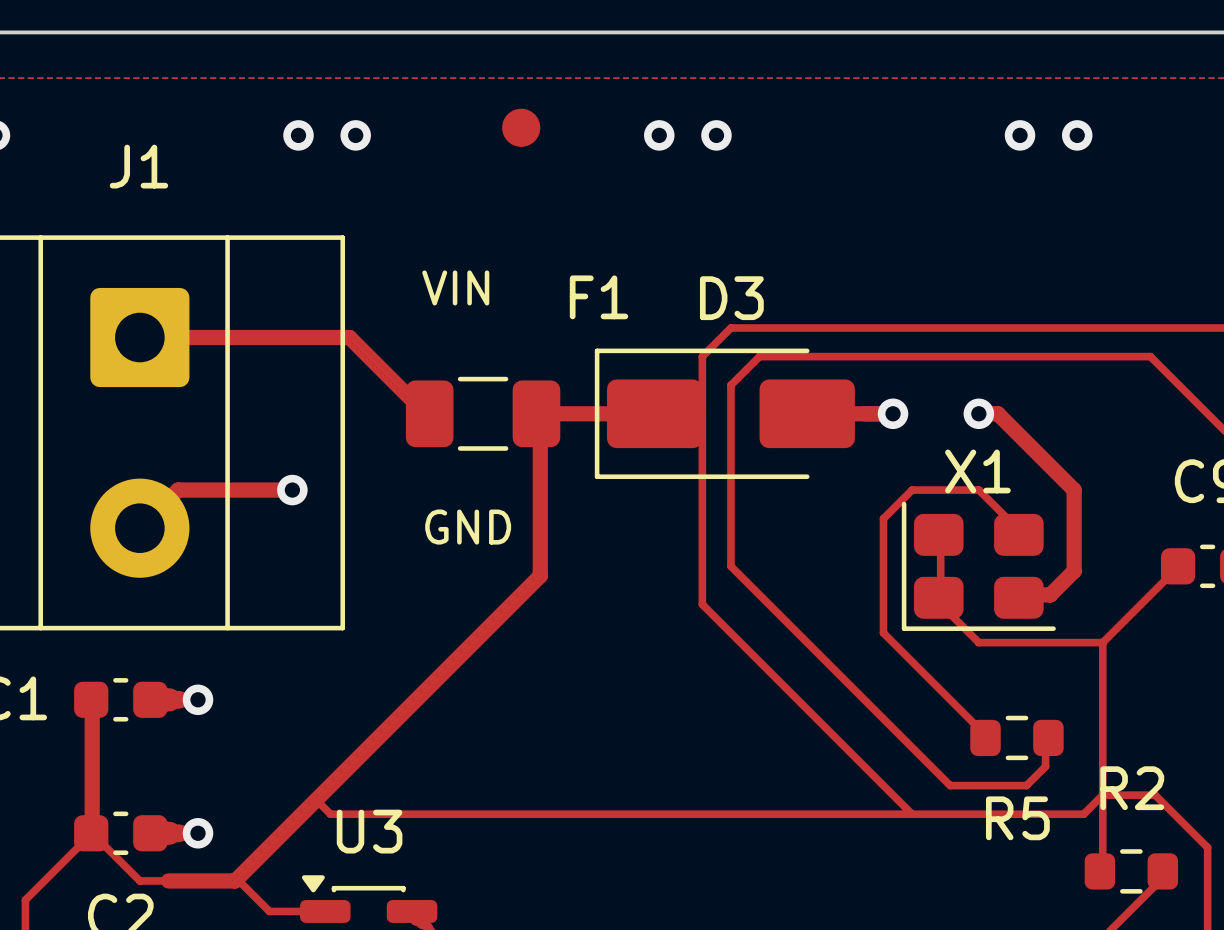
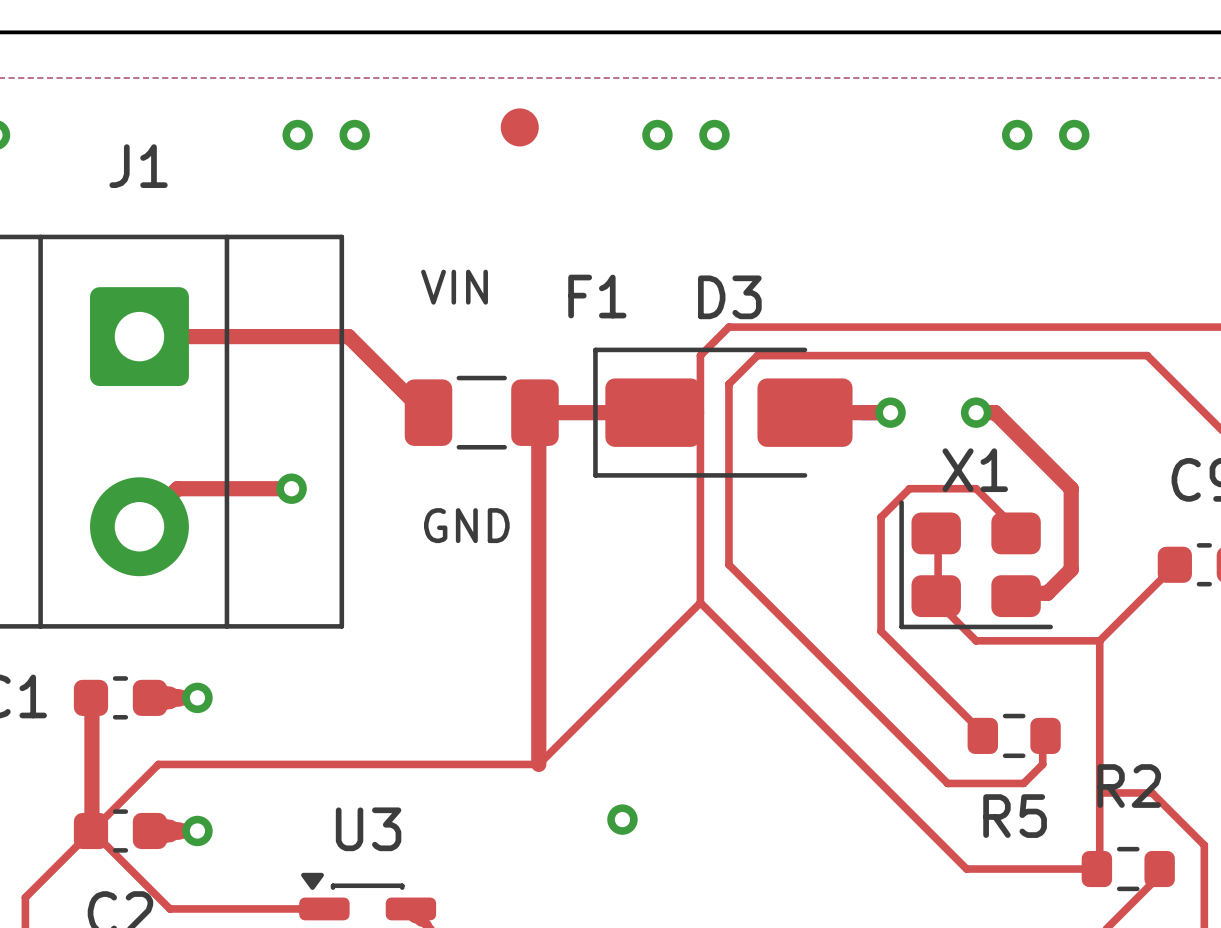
top track: (540, 575) (235, 880) (139, 880) -> (538, 574) (538, 764)
top track: none -> (700, 602) (538, 764)
top track: none -> (538, 764) (158, 764) (101, 821)
top track: (1102, 795) (1083, 814) (330, 814) (316, 799) -> none
top track: none -> (909, 811) (966, 869) (1096, 869)
via: none -> (622, 819)
top track: (237, 879) (269, 911) -> (139, 878) (169, 908) (268, 908)

